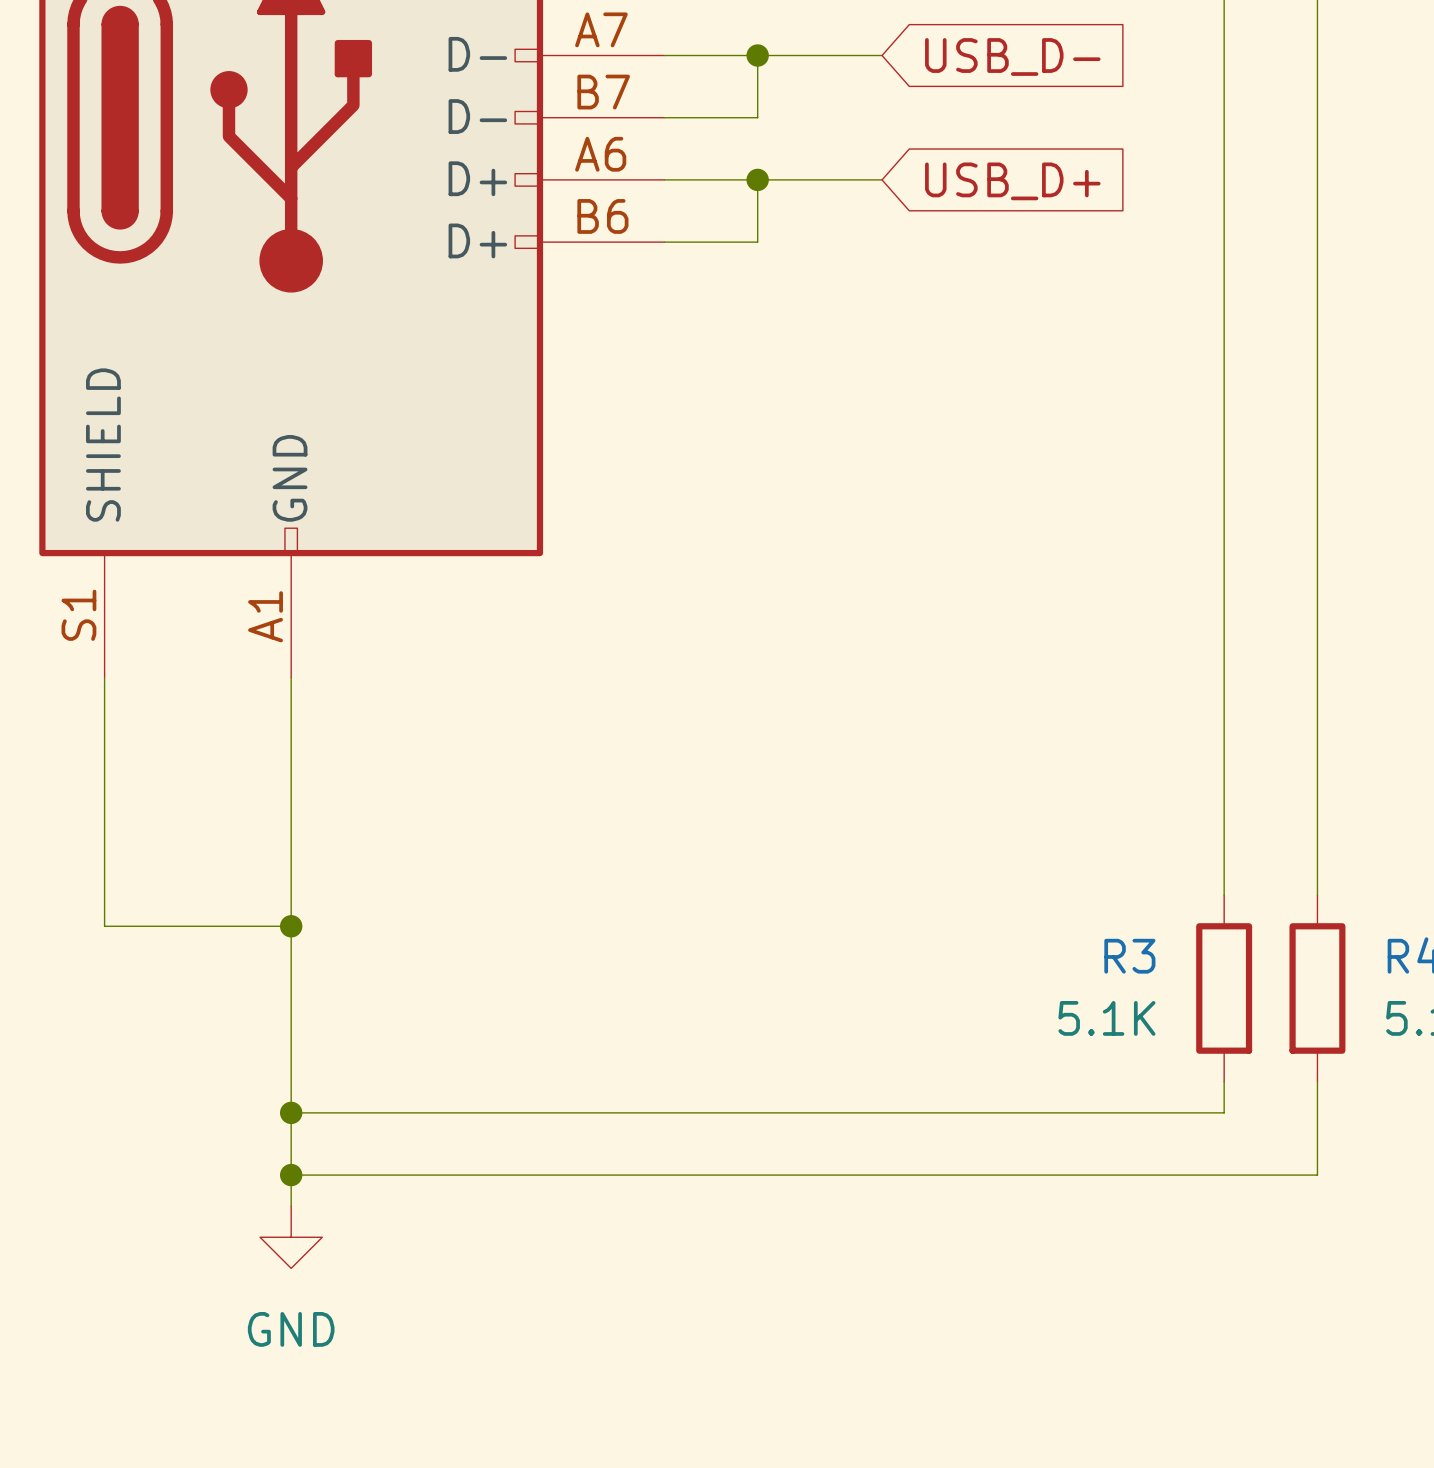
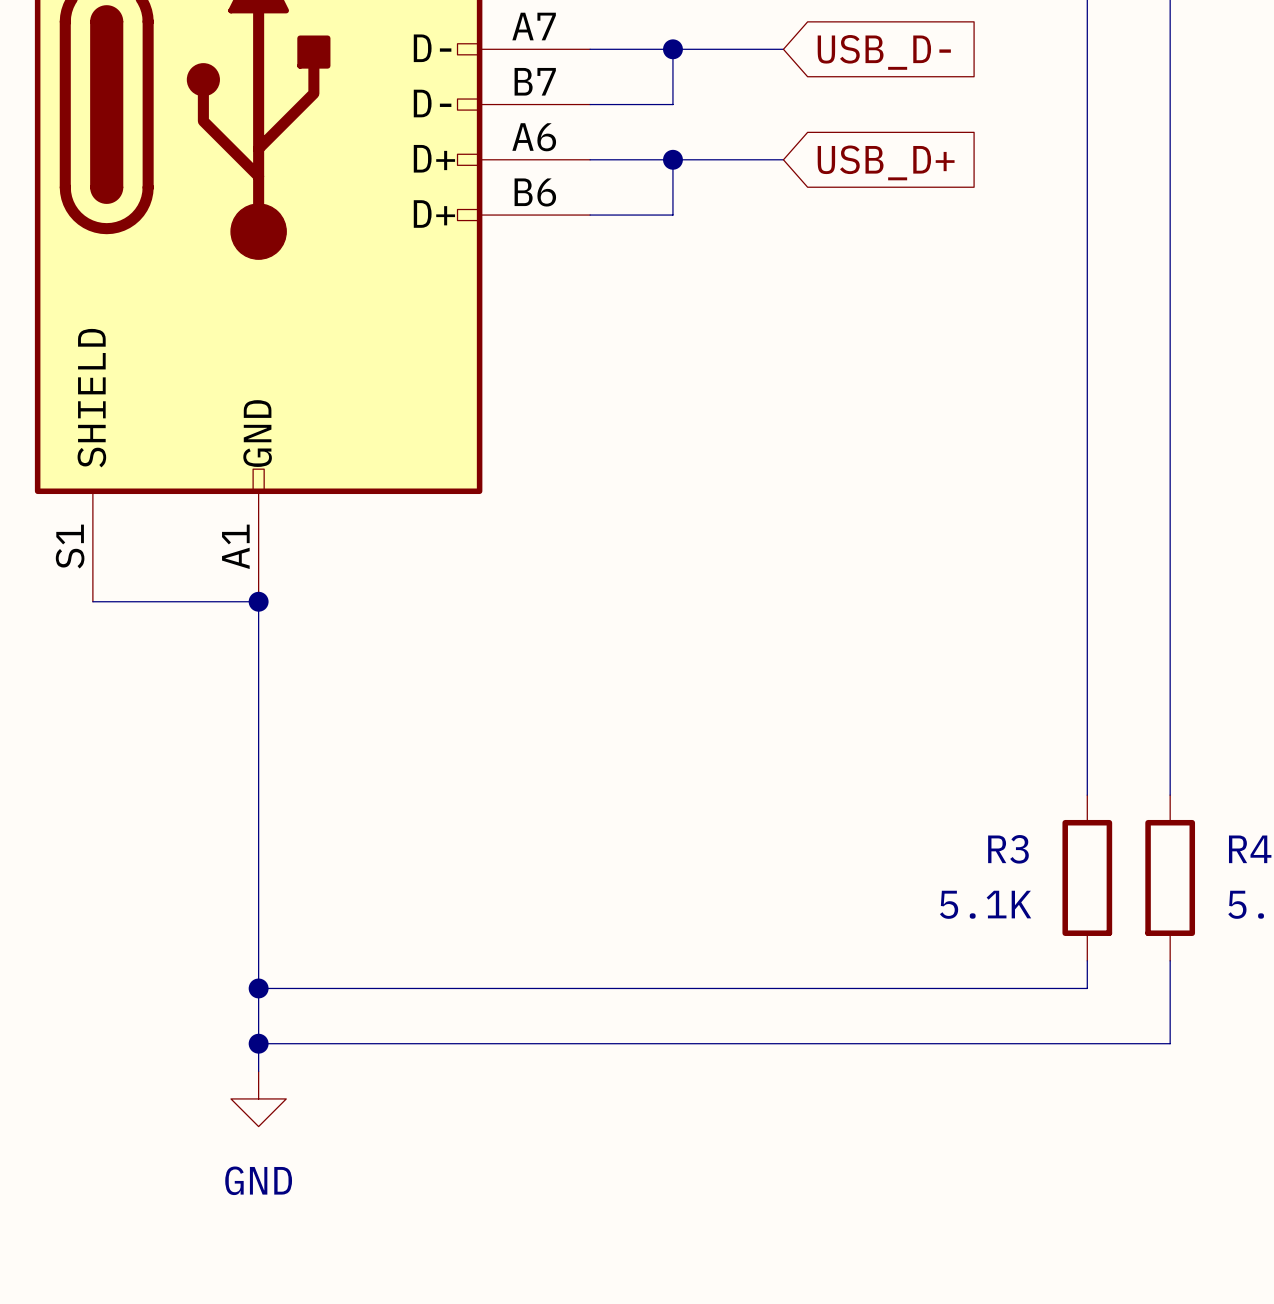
wire: (104, 677) (104, 926) (291, 926) -> (92, 601) (258, 601)
junction: none -> (258, 601)
junction: (291, 926) -> none

